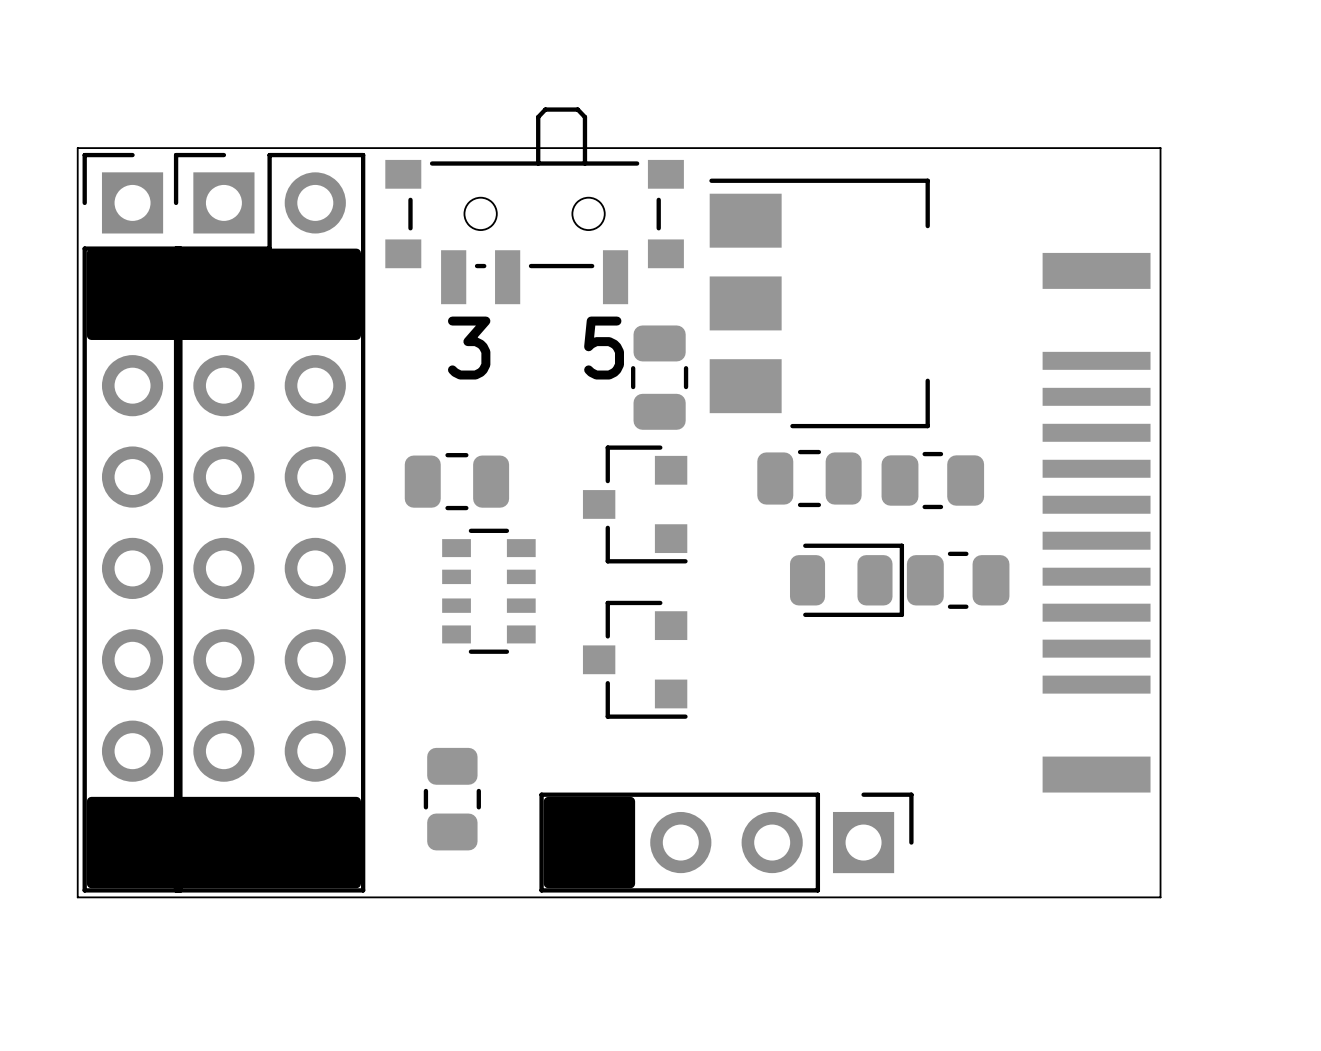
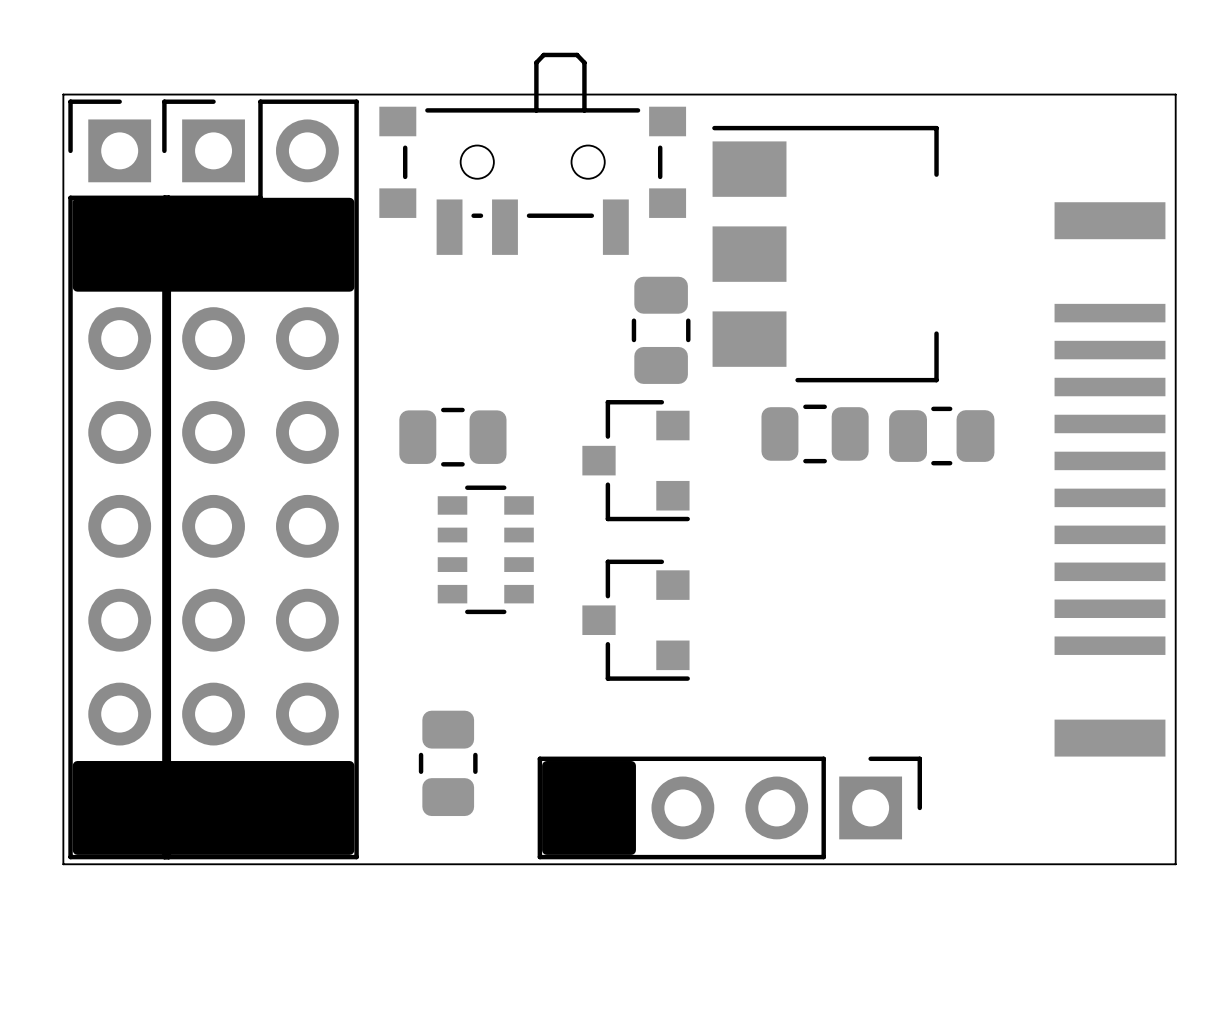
text: 3 5 (535, 348) -> none
part: (847, 580) -> none
part: (958, 580) -> none

